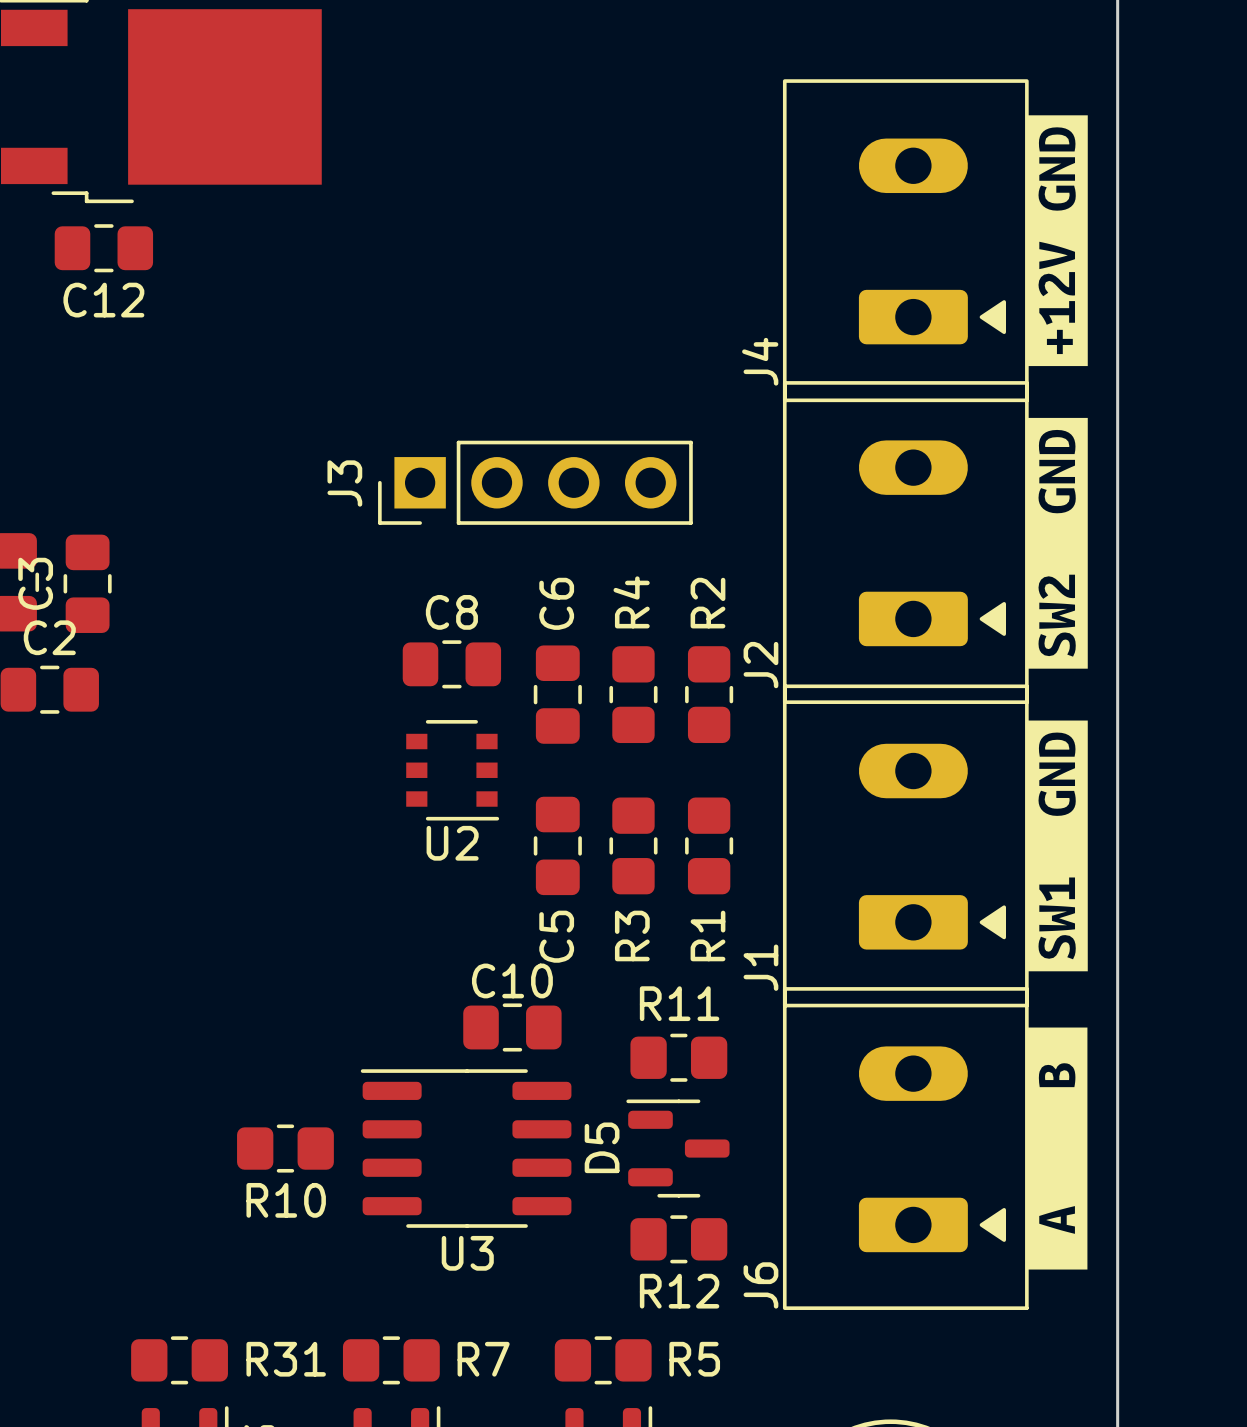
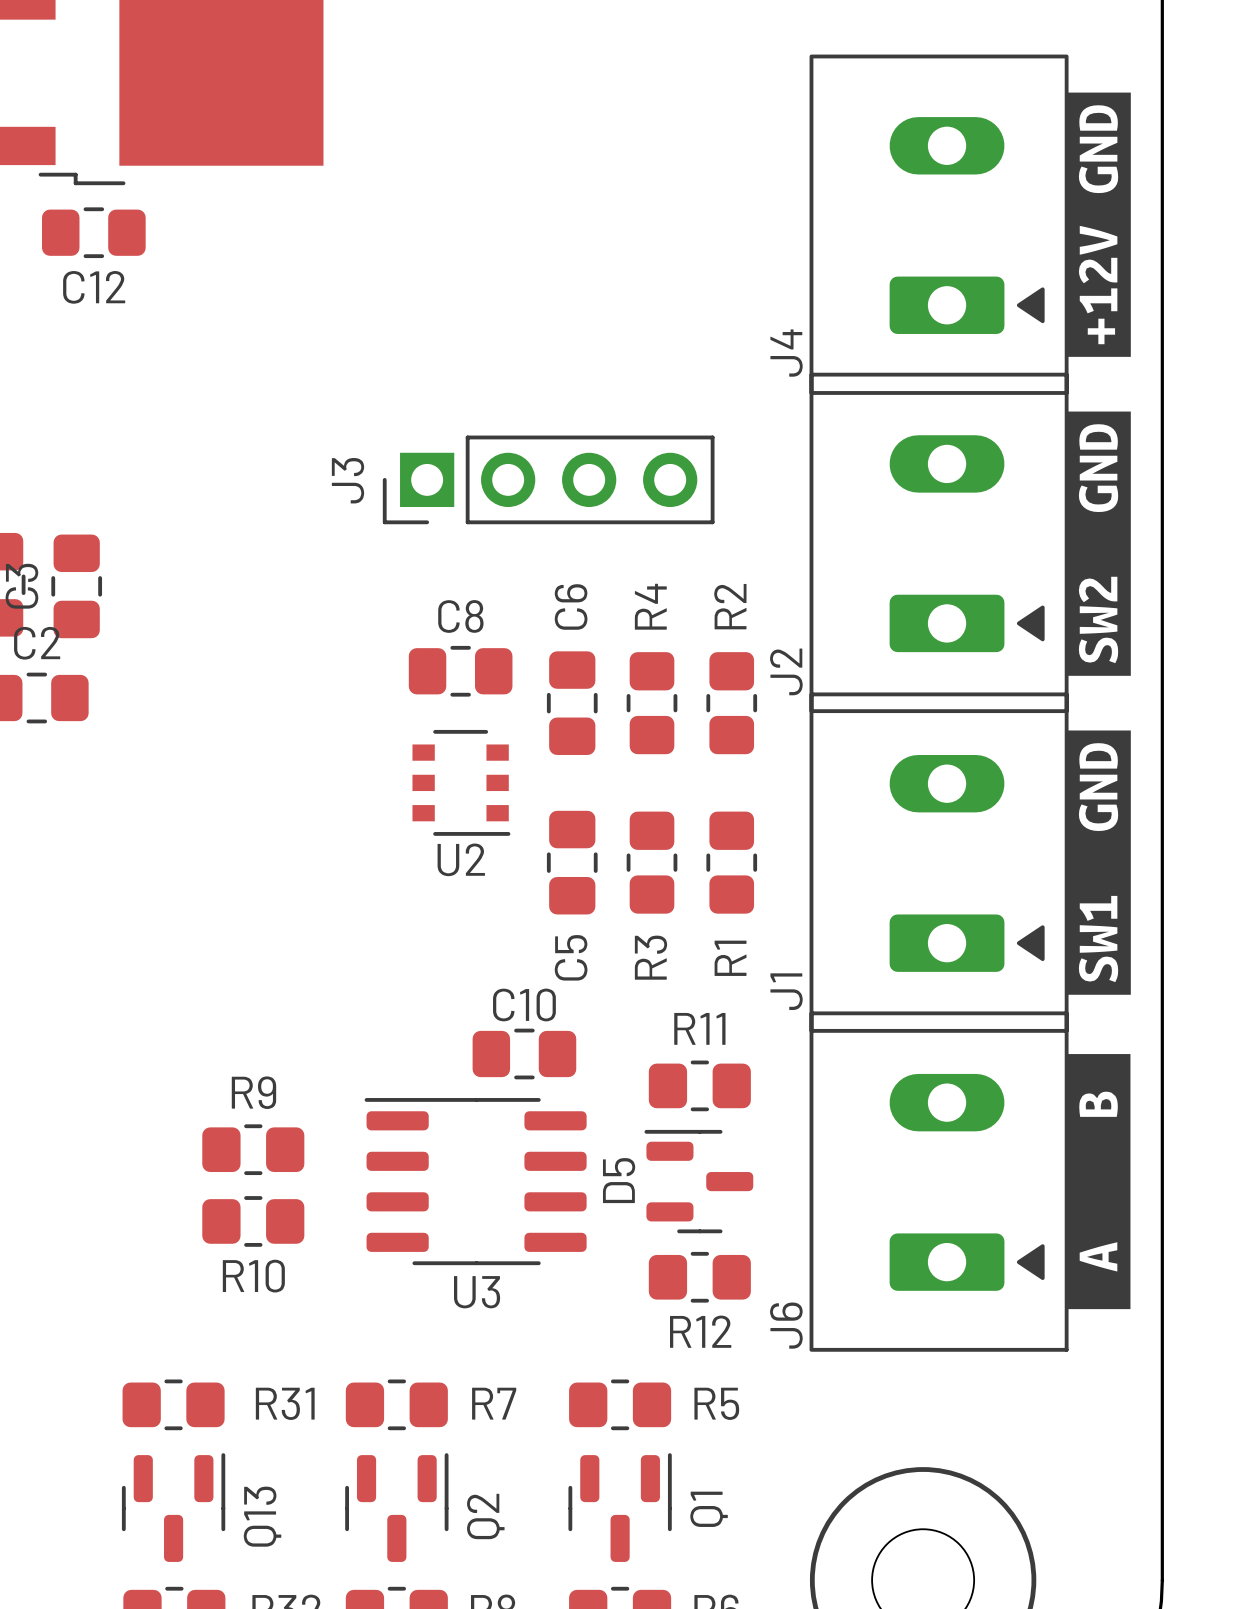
R9: none -> (253, 1149)
R10 position: (285, 1148) -> (253, 1221)

